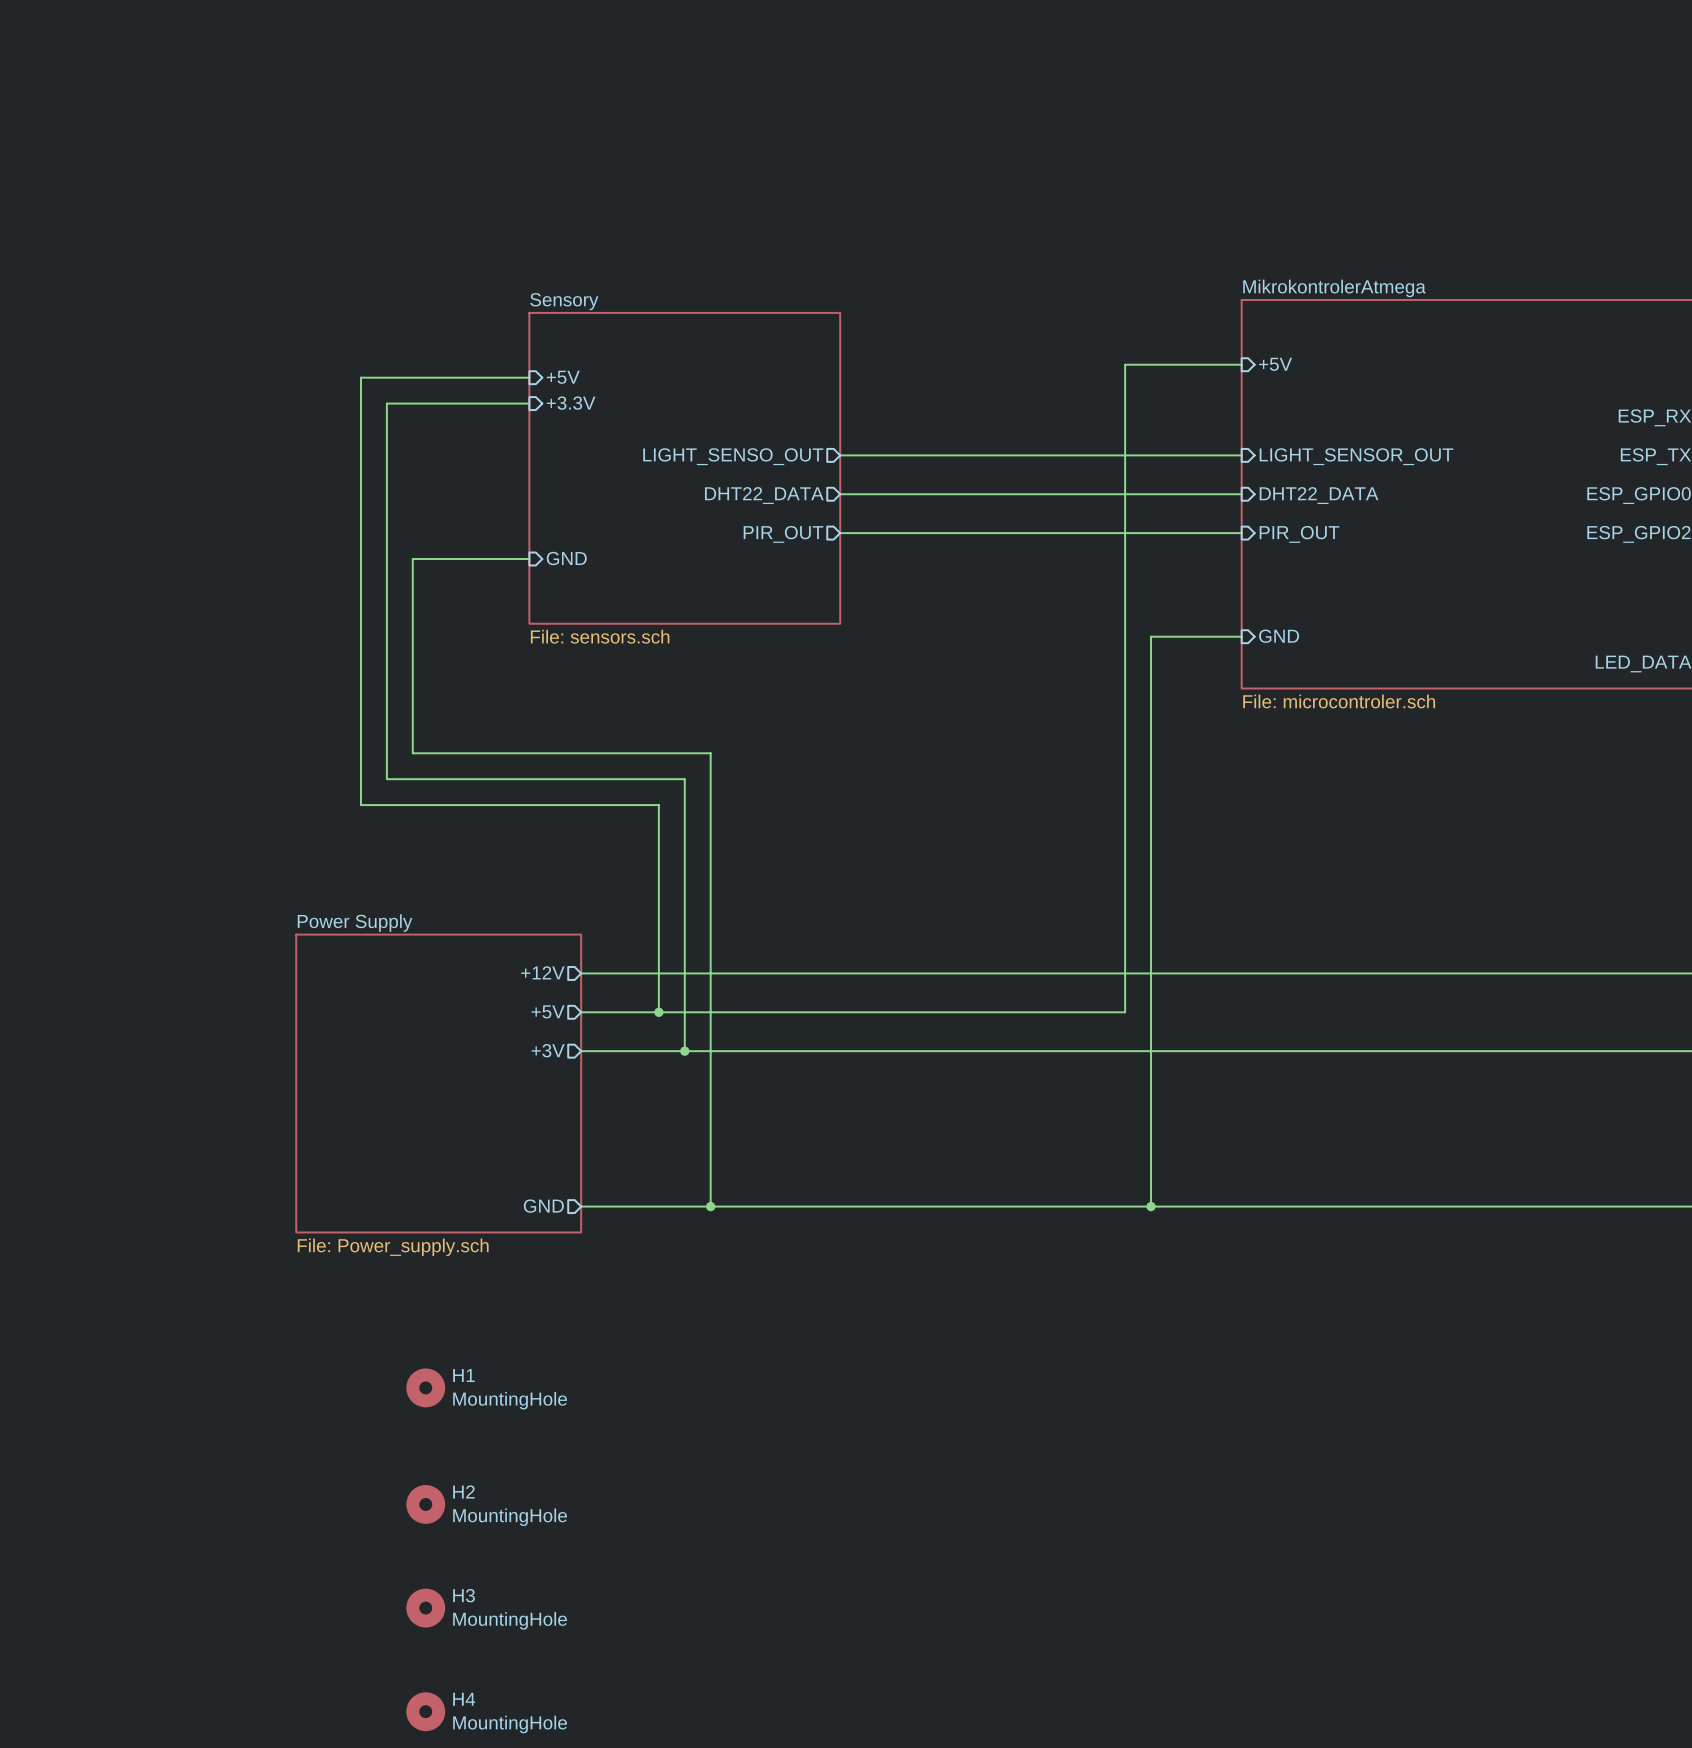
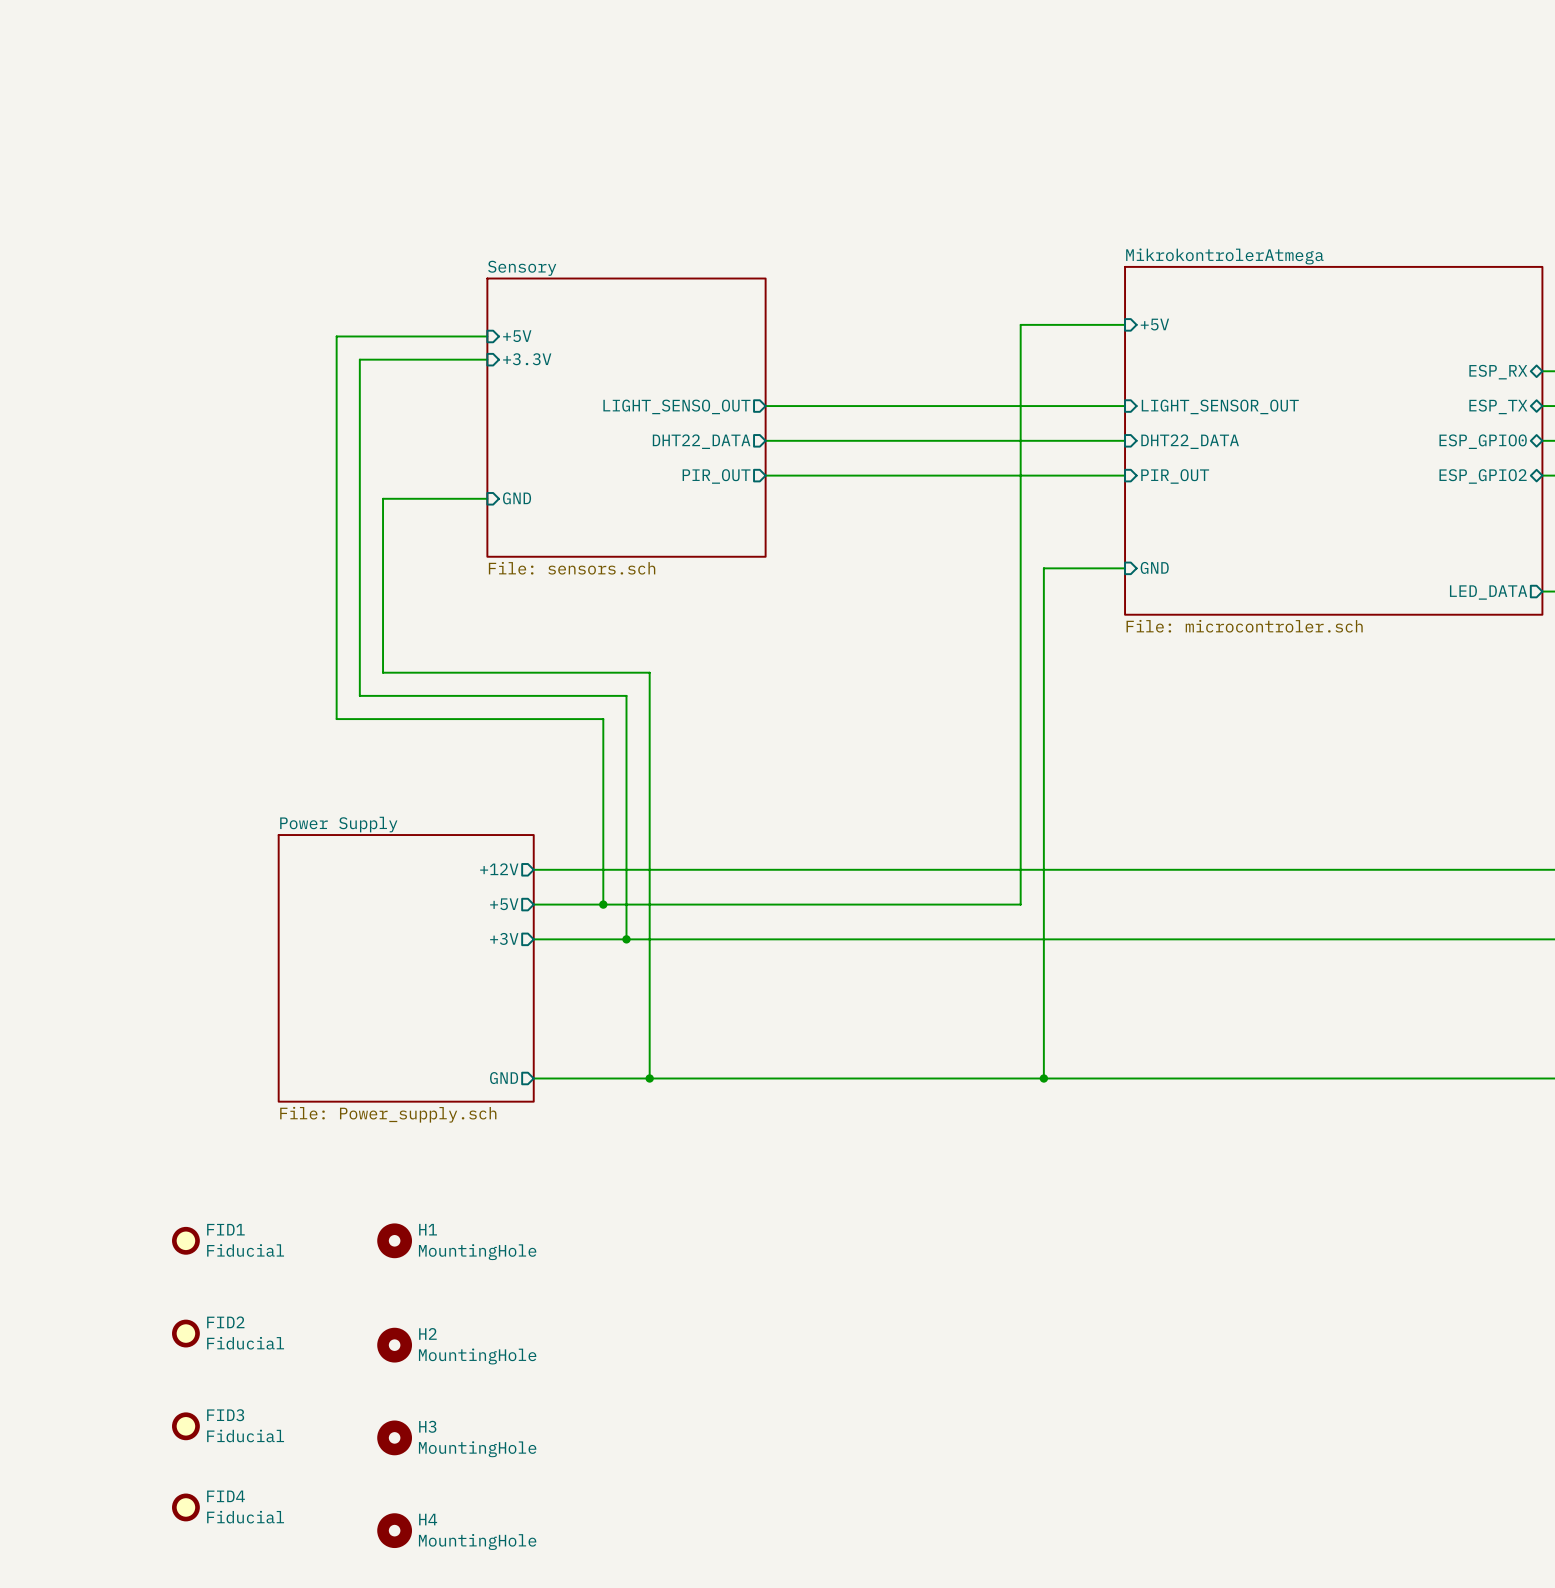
FID1: none -> Fiducial (185, 1240)
FID2: none -> Fiducial (185, 1333)
FID3: none -> Fiducial (185, 1426)
FID4: none -> Fiducial (185, 1507)

